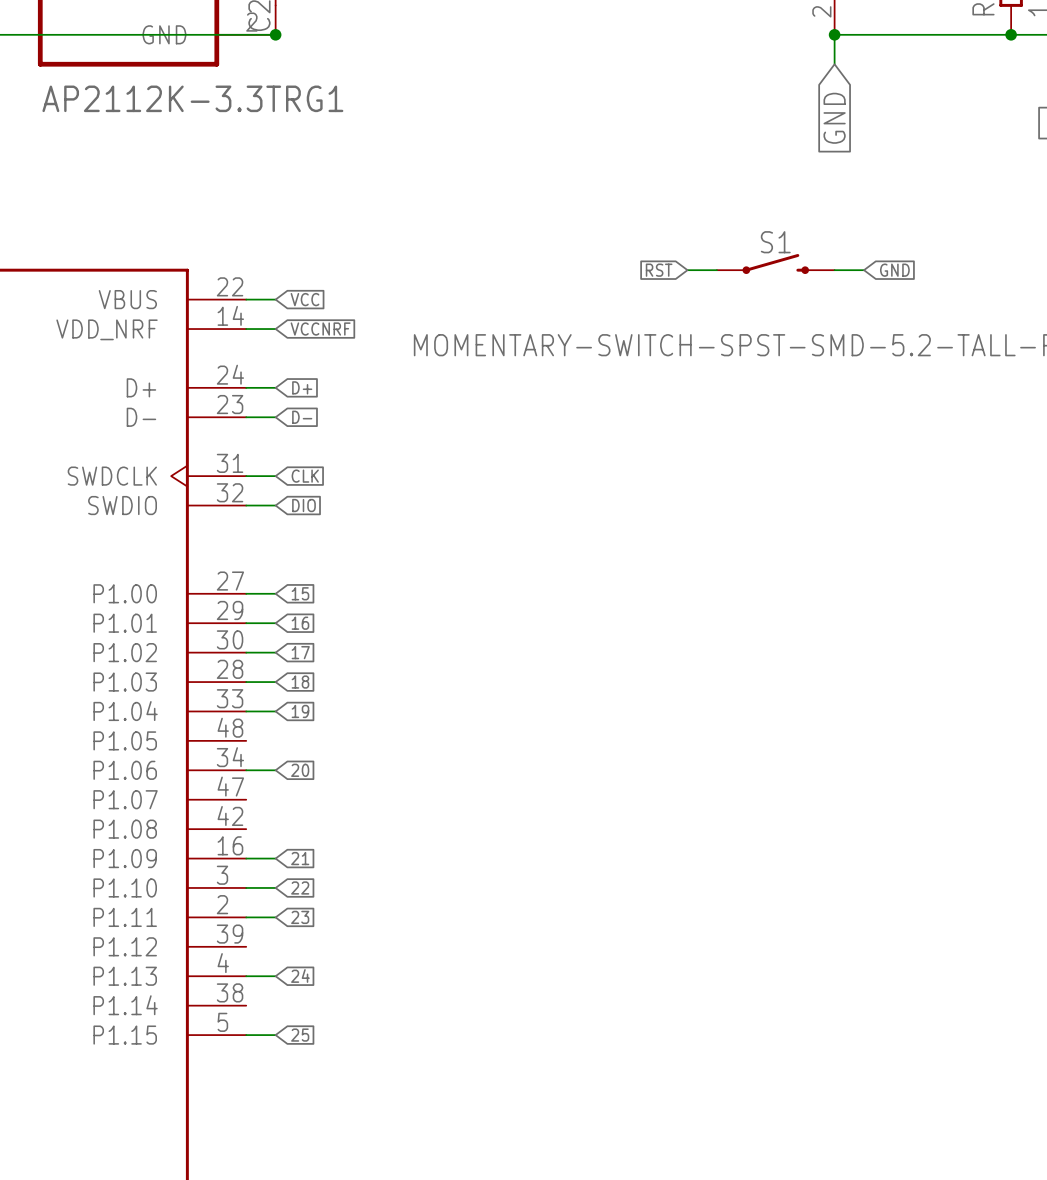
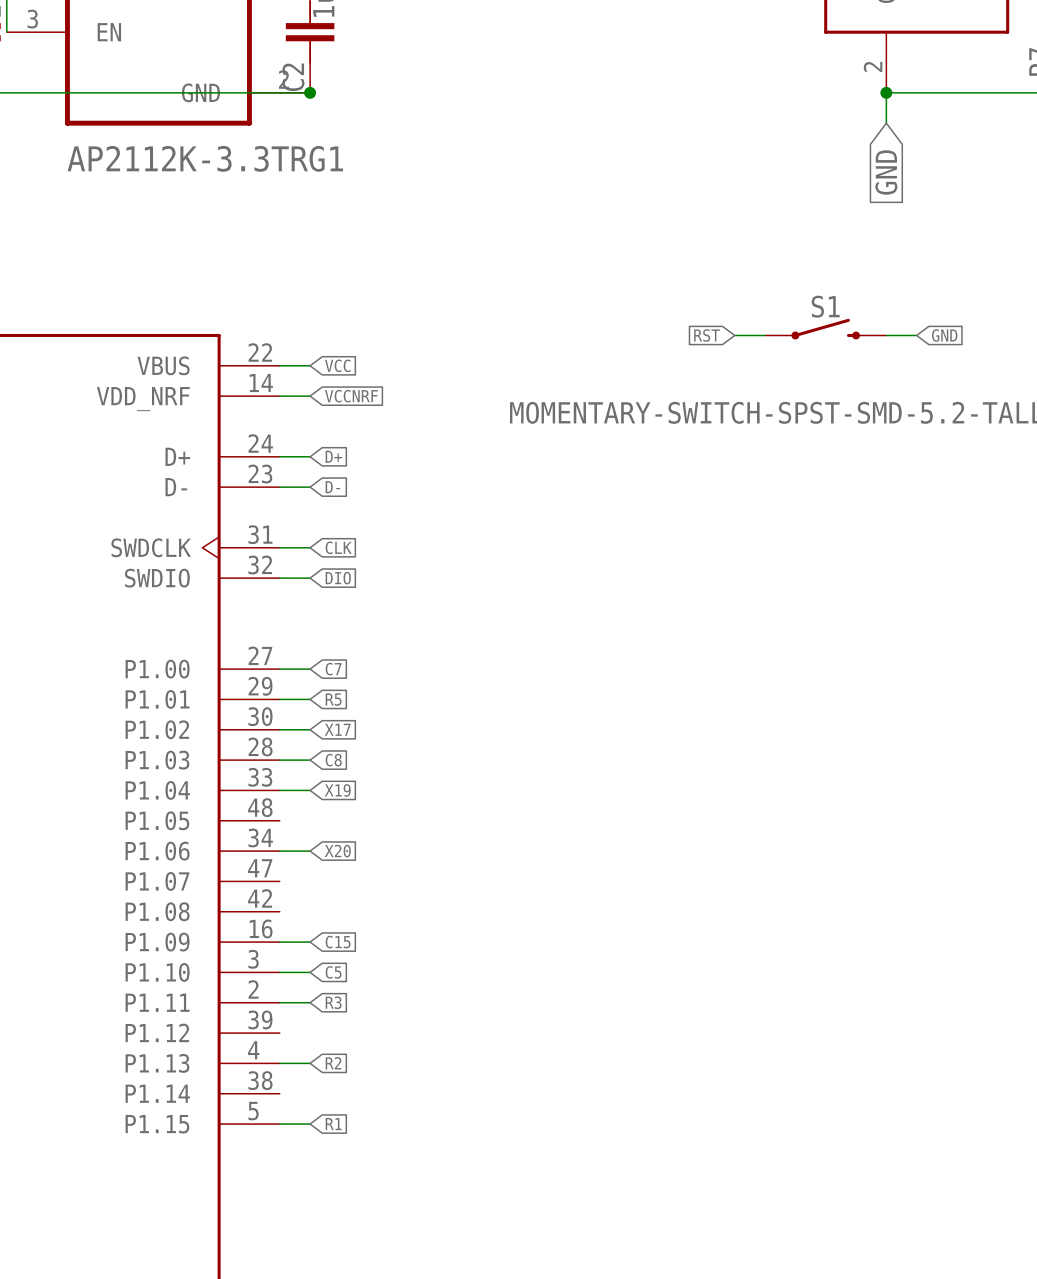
global label: 15 (300, 593) -> C7 (333, 669)
global label: 16 (300, 623) -> R5 (333, 699)
global label: 17 (300, 652) -> X17 (337, 729)
global label: 18 (300, 682) -> C8 (333, 760)
global label: 19 (300, 711) -> X19 (337, 790)
global label: 20 (300, 770) -> X20 (337, 851)
global label: 21 (300, 858) -> C15 (338, 942)
global label: 22 (300, 887) -> C5 (333, 972)
global label: 23 (300, 917) -> R3 (333, 1002)
global label: 24 (300, 975) -> R2 (333, 1063)
global label: 25 (300, 1035) -> R1 (333, 1124)

